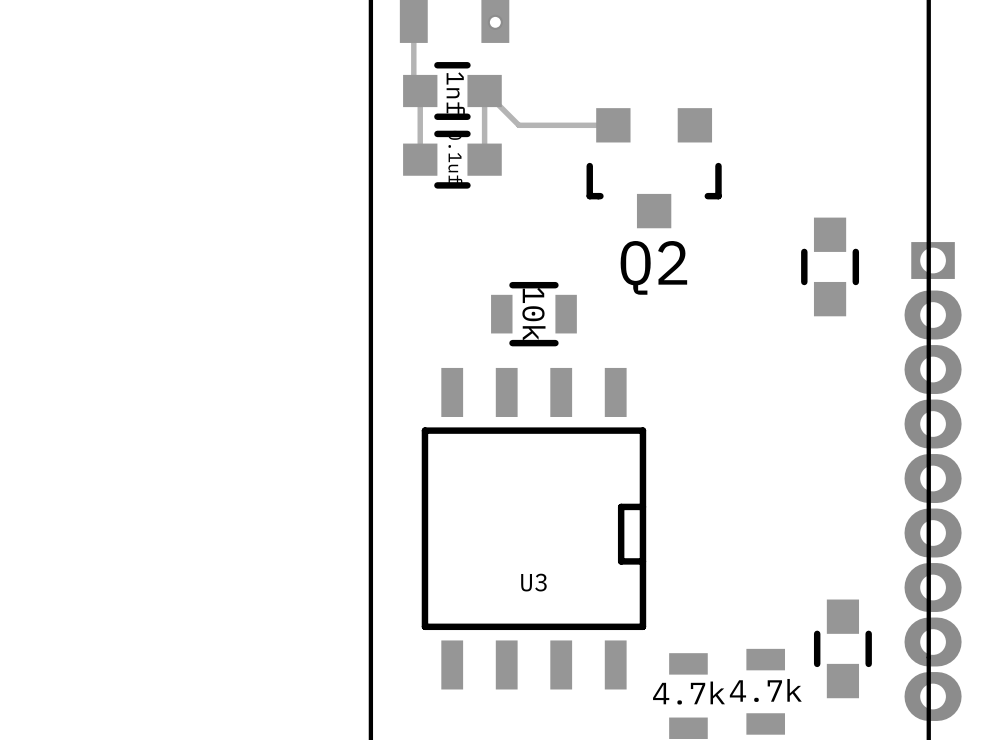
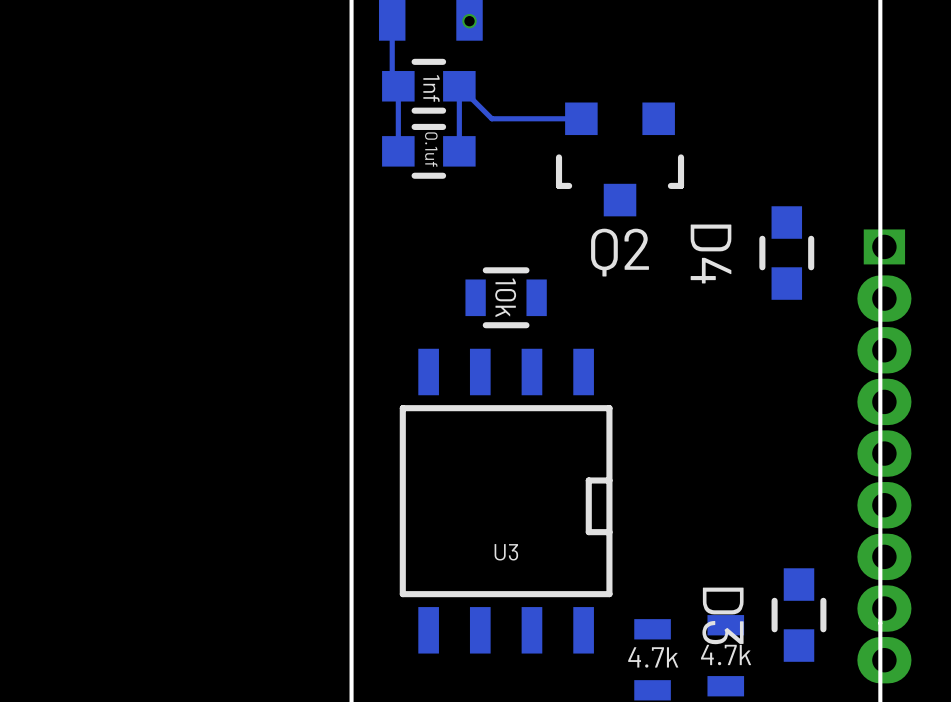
D4 name: none -> D4 (711, 253)
D3 name: none -> D3 (722, 615)

